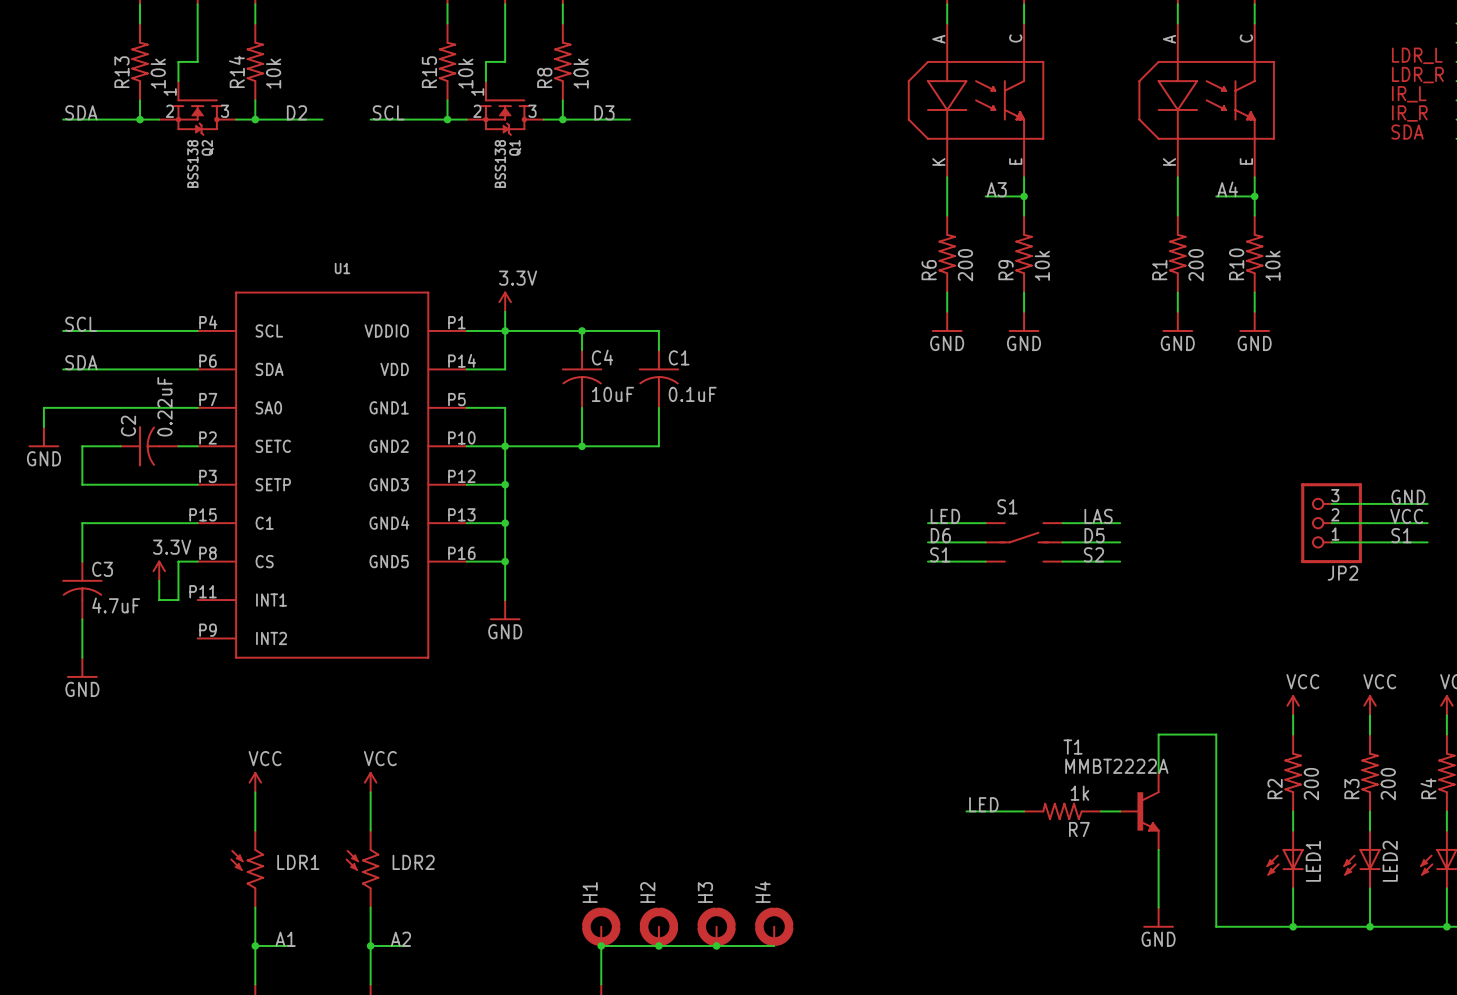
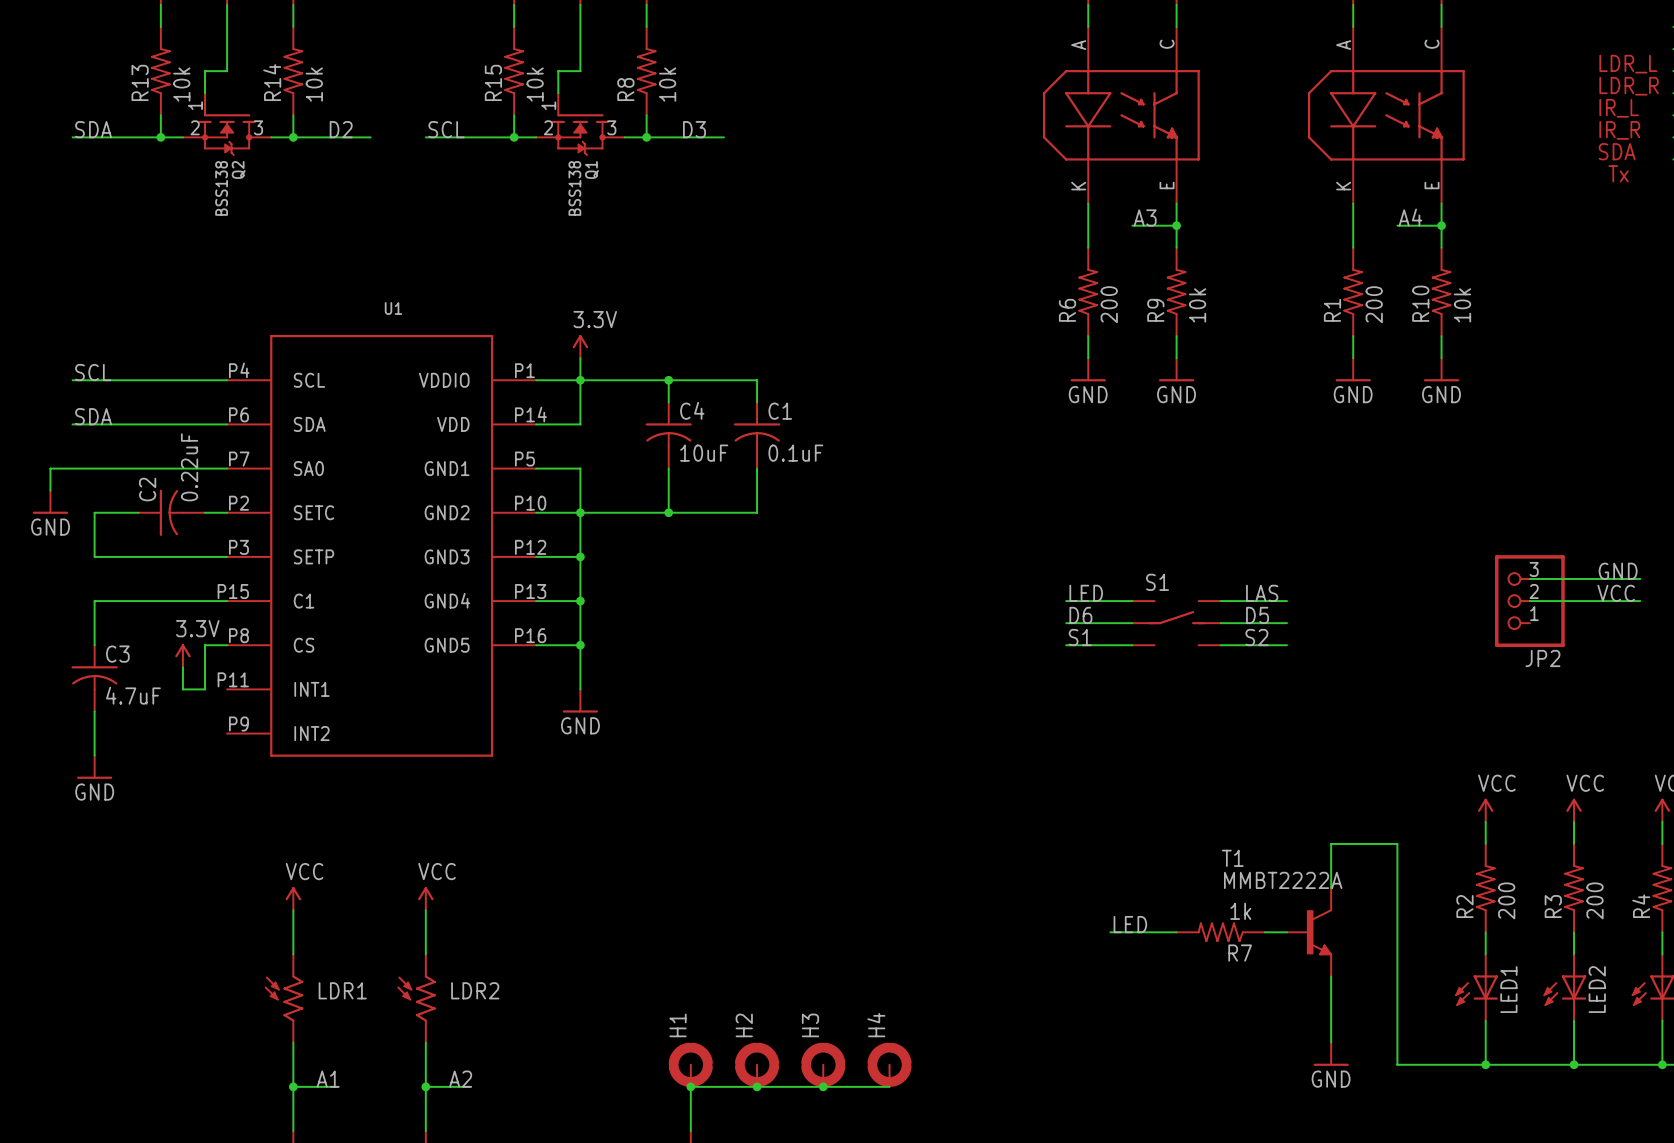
text: none -> Tx (1618, 173)
label: S1 (1401, 535) -> none
wire: (1331, 542) (1427, 542) -> none

